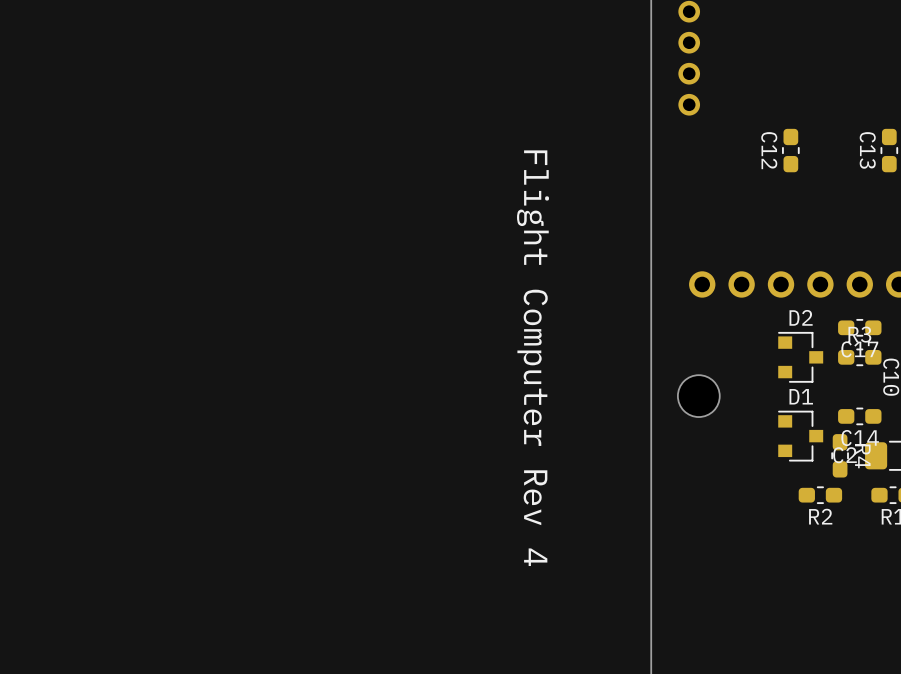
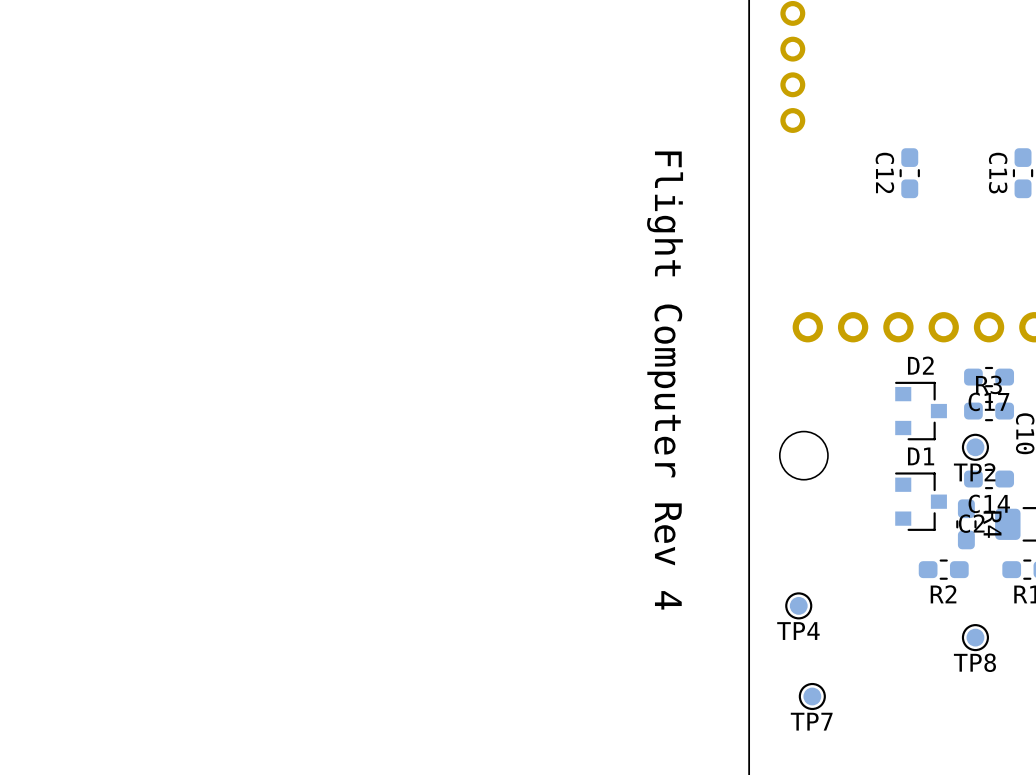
text position: Flight Computer Rev 4 (533, 358) -> Flight Computer Rev 4 (665, 380)
TP2: none -> (975, 447)
TP4: none -> (798, 605)
TP8: none -> (975, 637)
TP7: none -> (812, 696)

